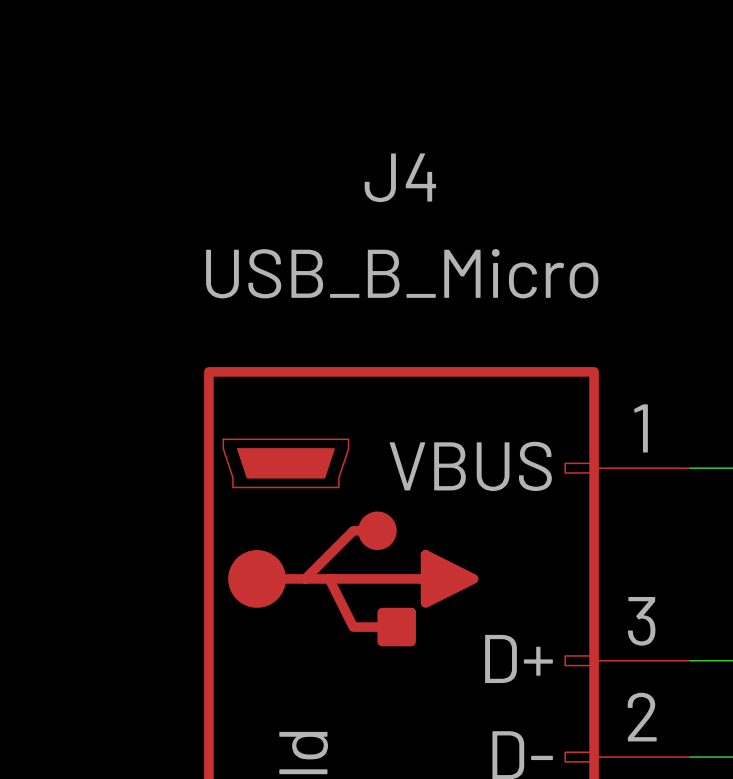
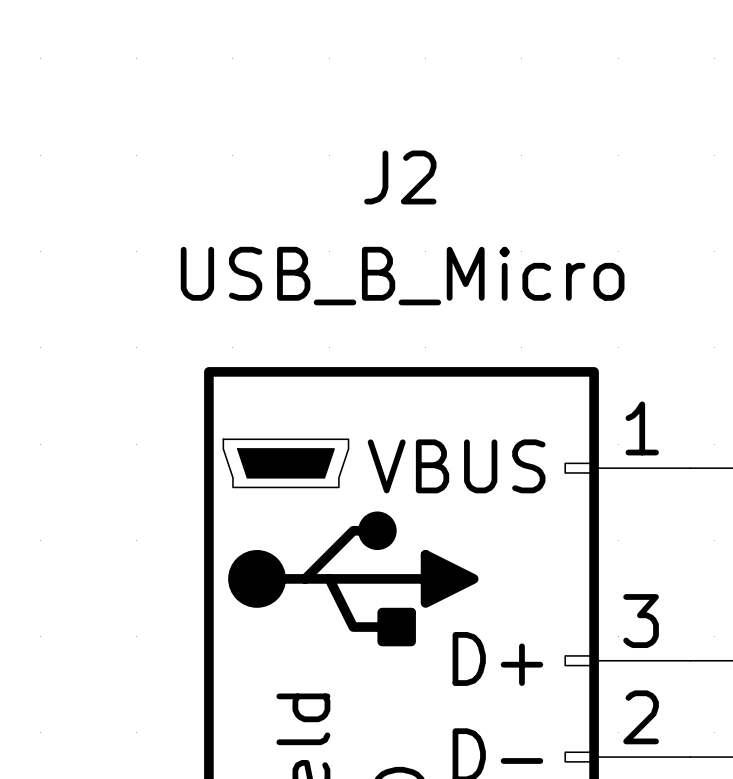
J4 name: J4 (400, 177) -> J2 (400, 177)

